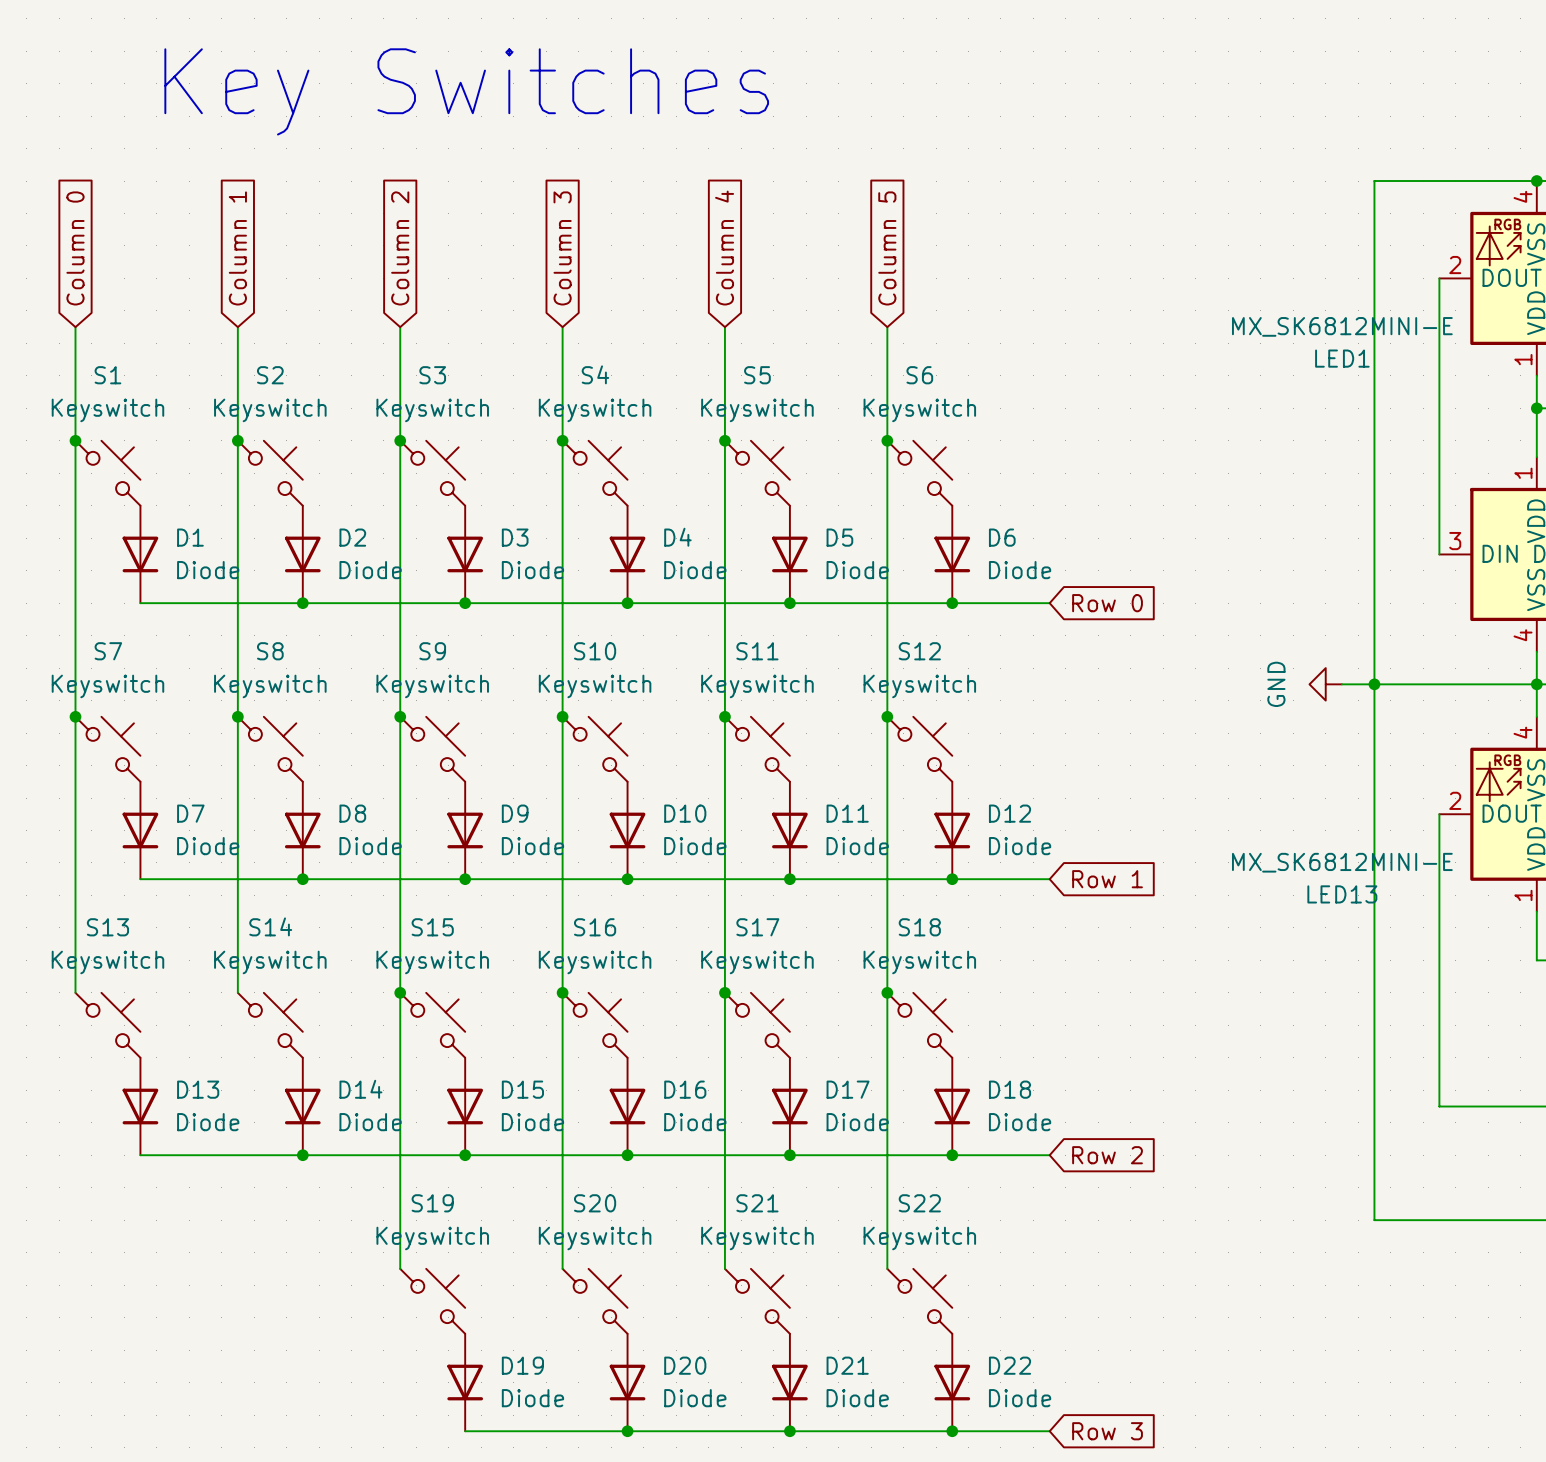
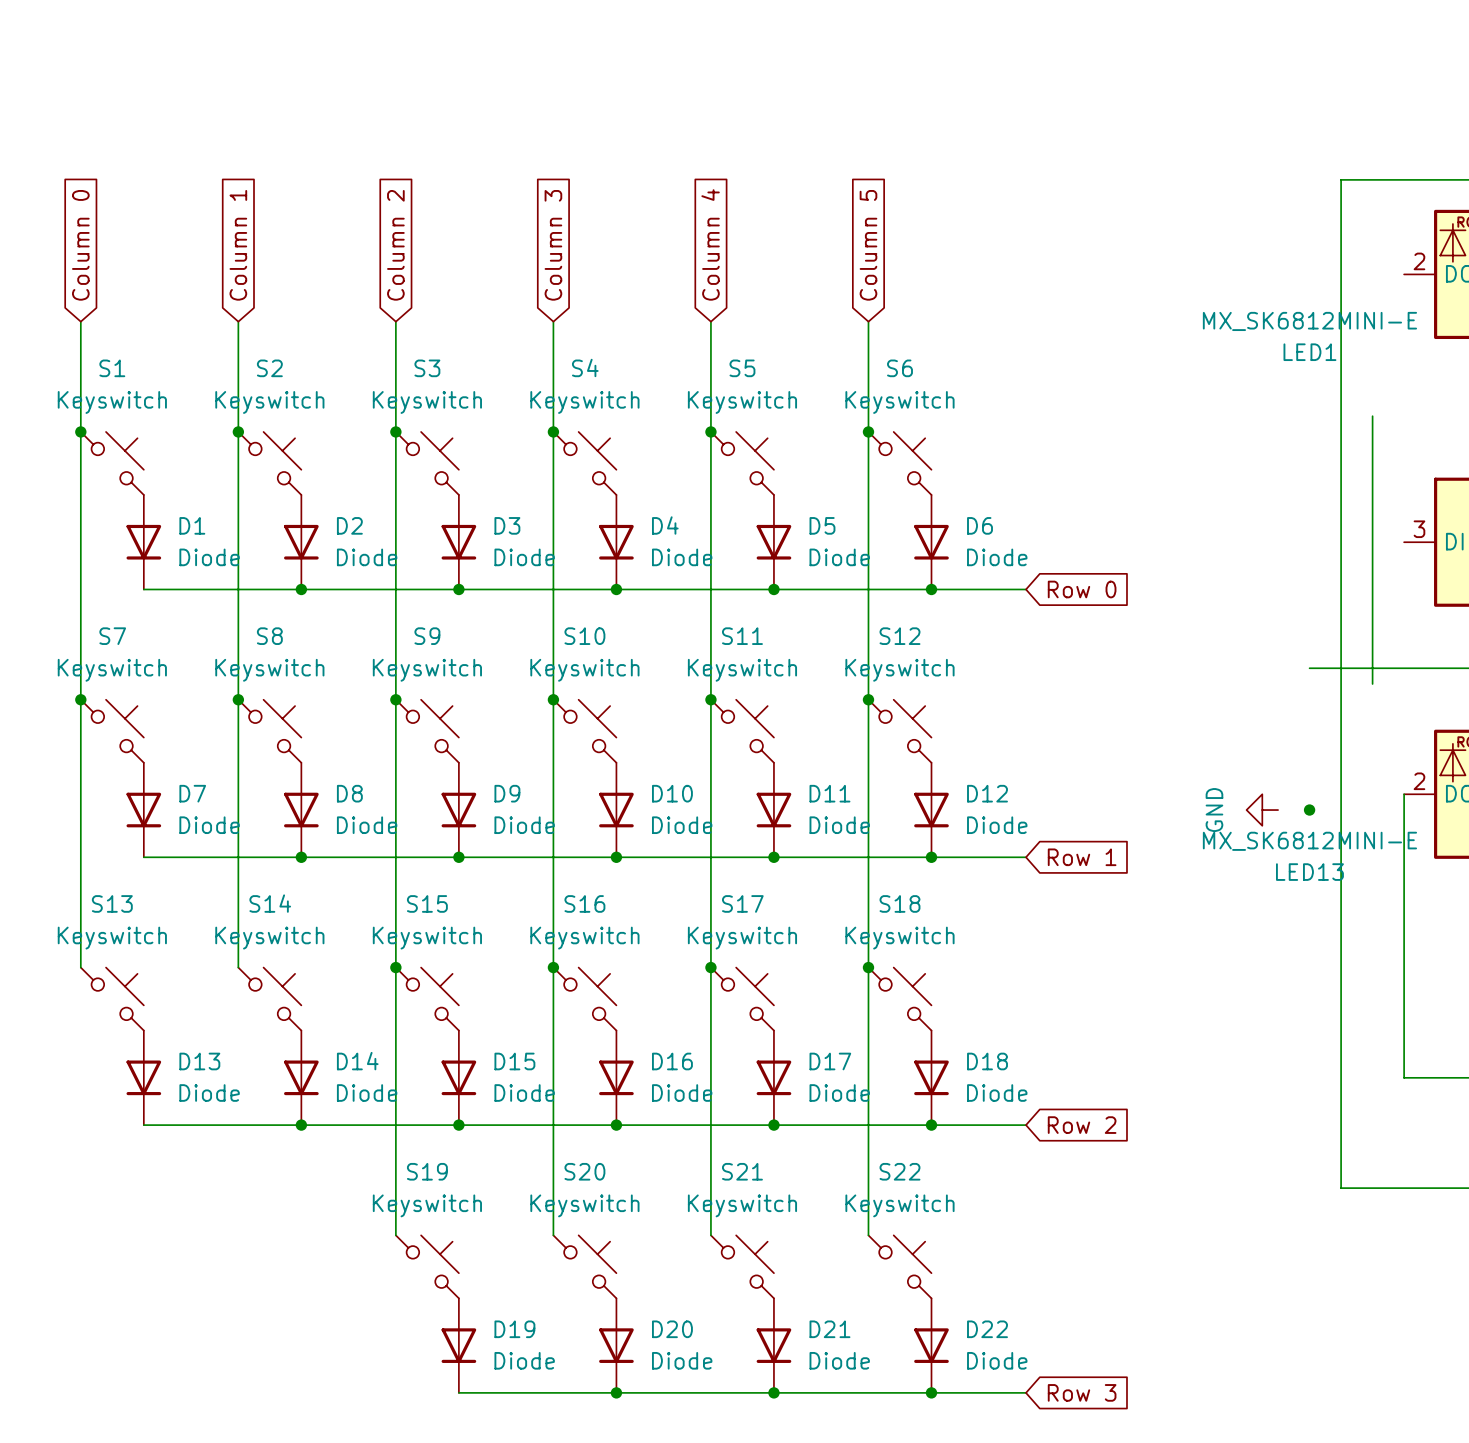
text: Key Switches (466, 91) -> none
wire: (1439, 278) (1439, 554) -> (1372, 416) (1372, 684)
power symbol position: GND (1325, 684) -> GND (1262, 810)
junction: (1374, 684) -> none
junction: none -> (1309, 810)

